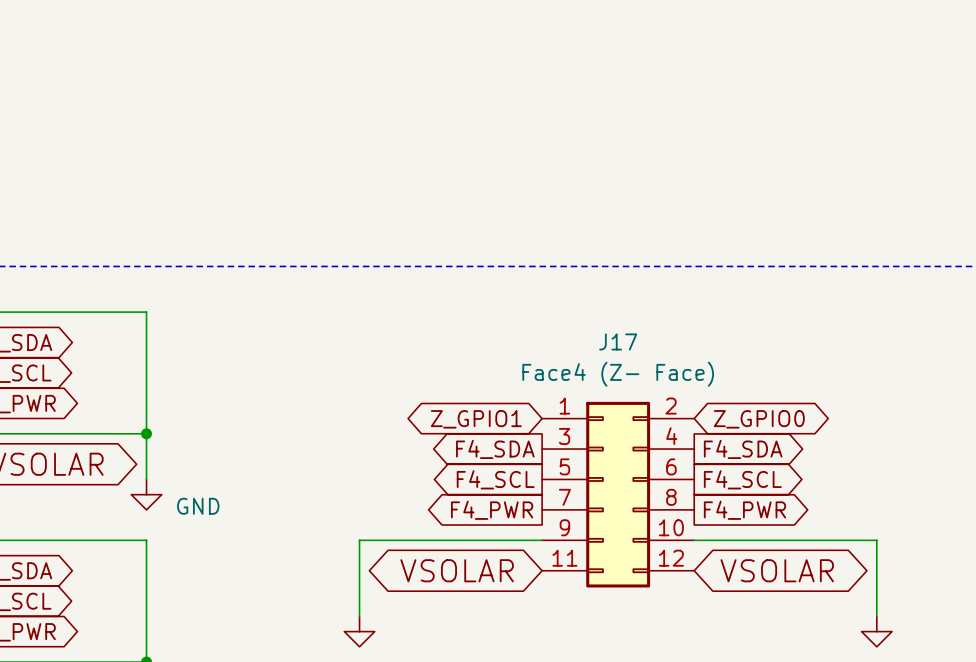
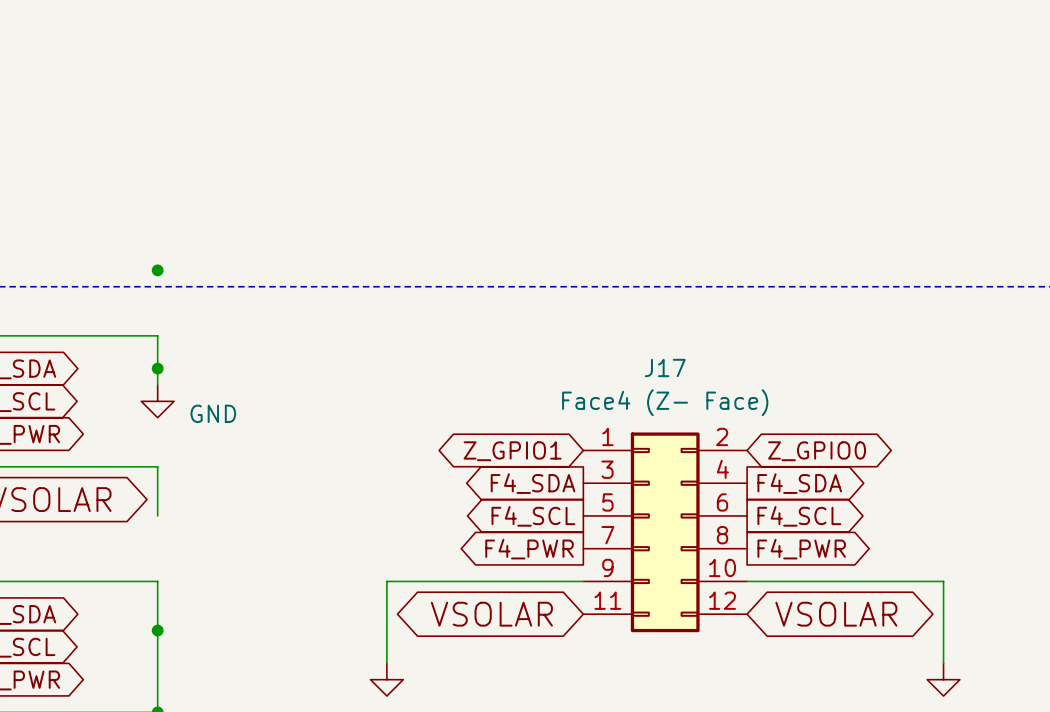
junction: none -> (157, 270)
junction: none -> (157, 368)
wire: (146, 357) (146, 433) -> none
junction: (146, 433) -> none
power symbol position: GND (146, 494) -> GND (157, 401)
junction: none -> (157, 630)

